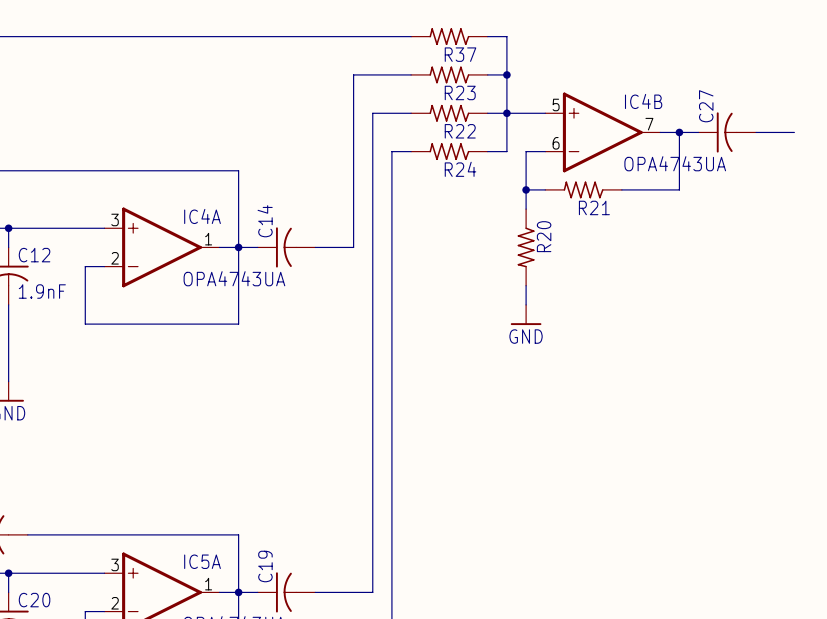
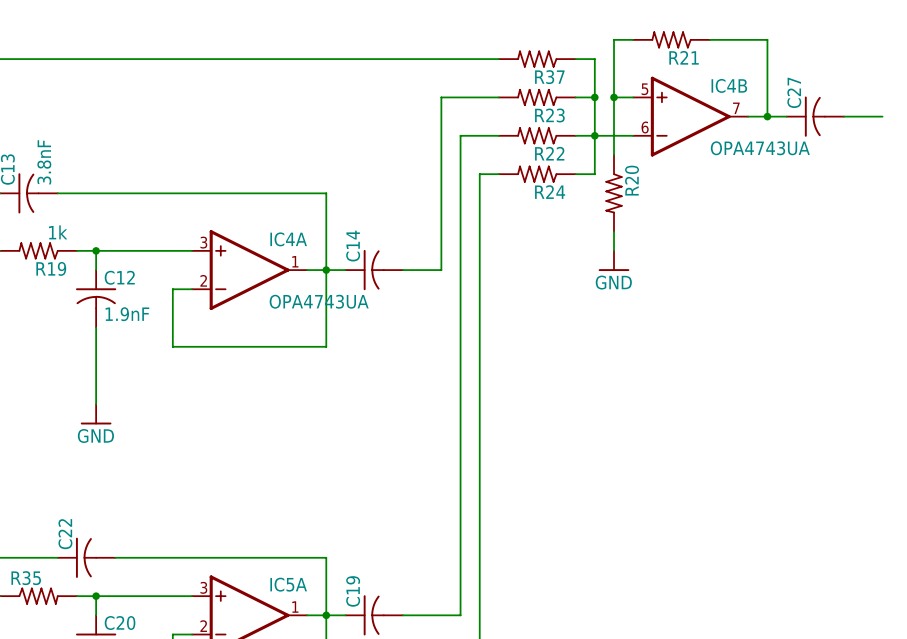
wire: none -> (633, 39) (614, 39) (614, 154)
wire: none -> (709, 39) (767, 39) (767, 116)
junction: none -> (614, 97)
IC4B position: (602, 132) -> (690, 116)
wire: (660, 132) (698, 132) -> (748, 116) (786, 116)
wire: (679, 132) (679, 189) (621, 189) -> none
junction position: (679, 132) -> (767, 116)
C27 position: (727, 132) -> (815, 116)
wire: (756, 132) (794, 132) -> (844, 116) (882, 116)
wire: (526, 189) (545, 189) -> (614, 97) (633, 97)
junction: (526, 189) -> none
R21 position: (583, 189) -> (671, 39)
R20 position: (526, 247) -> (614, 193)
wire: (526, 285) (526, 304) -> none
power symbol position: GND (526, 314) -> GND (614, 260)

